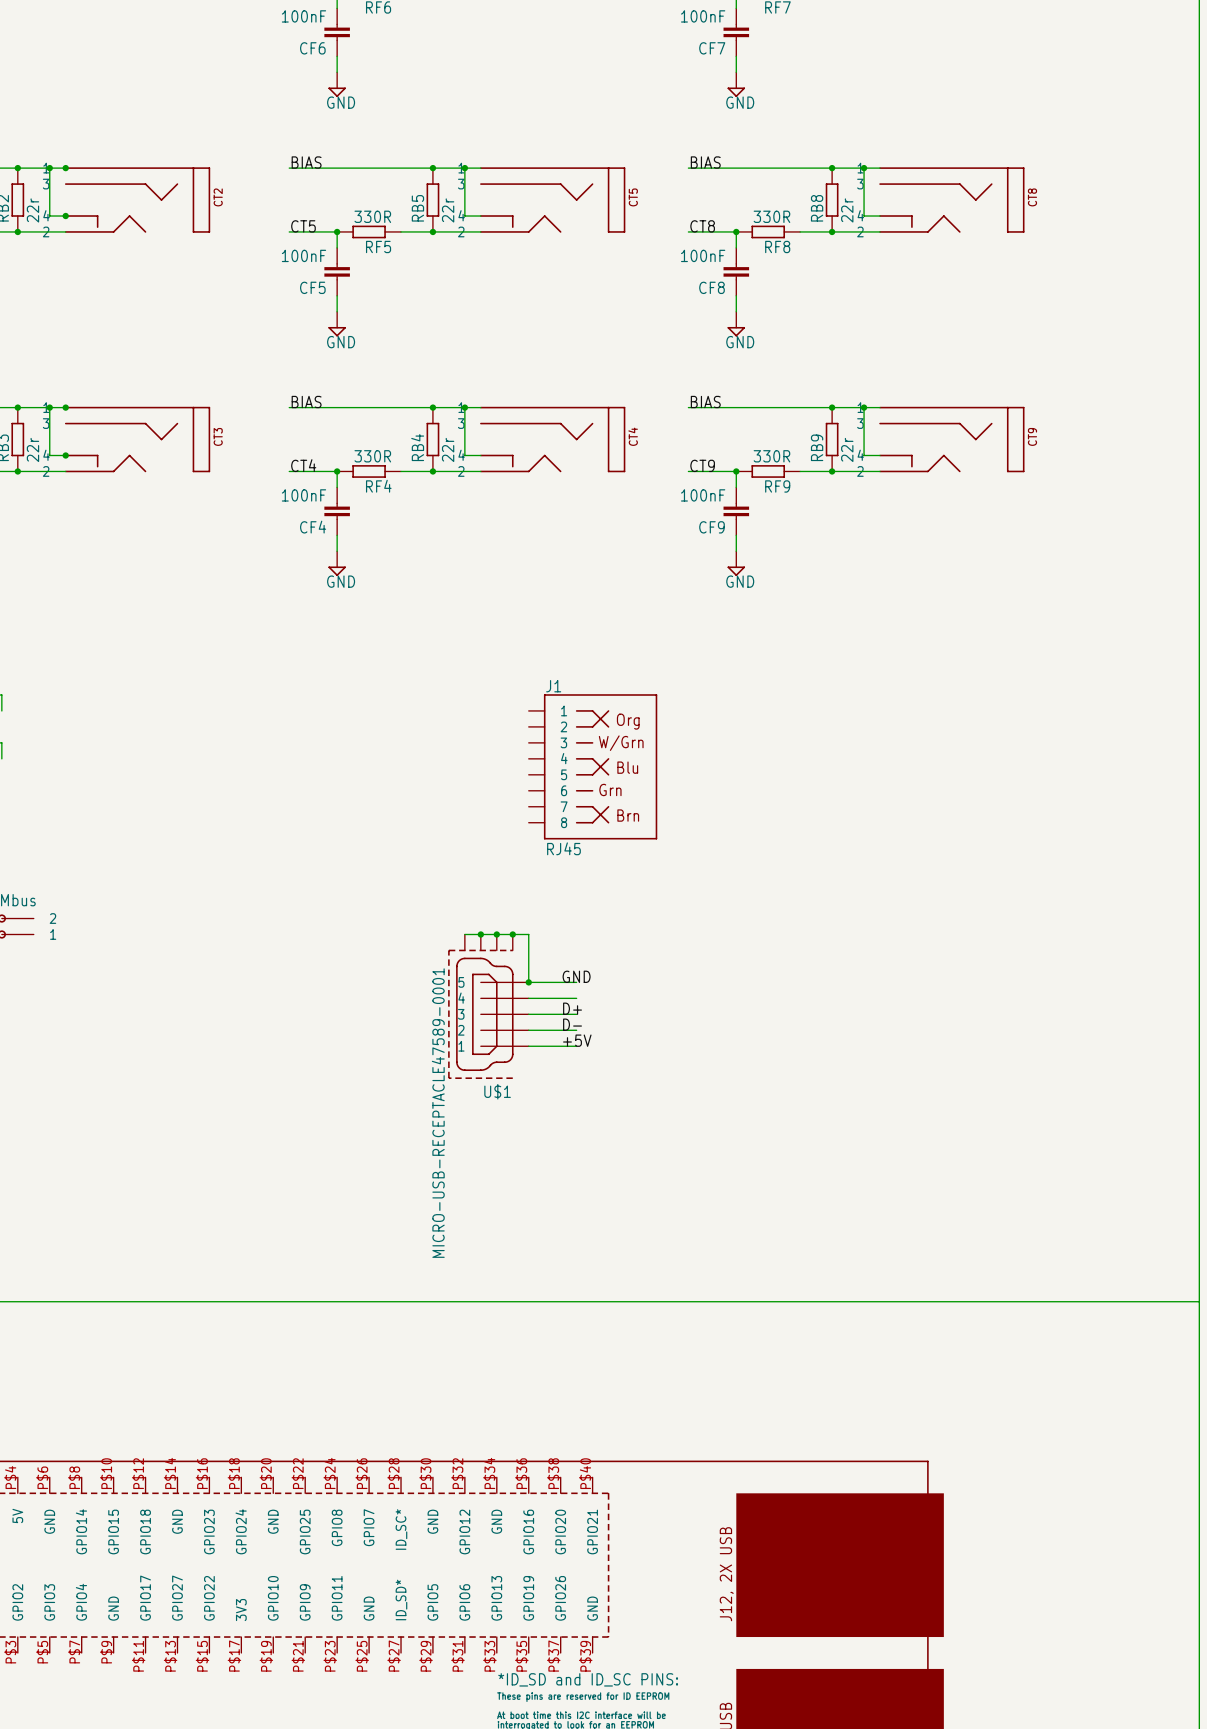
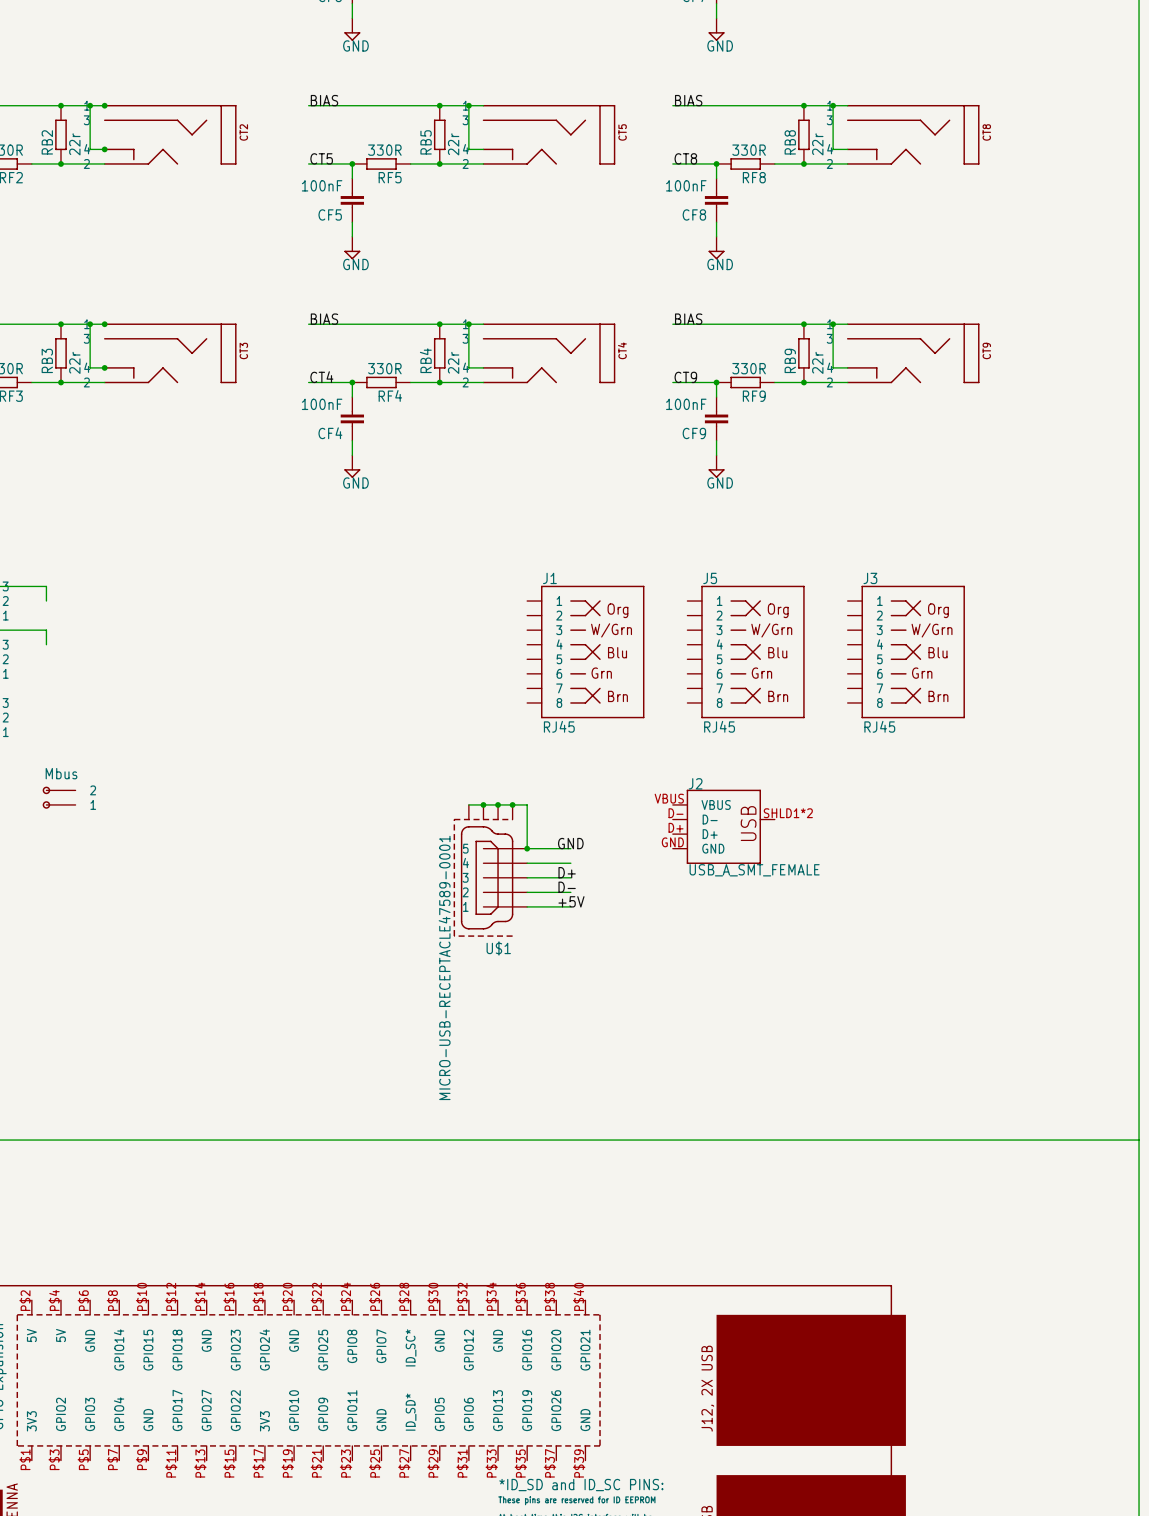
J5: none -> RJ45 (746, 652)
J3: none -> RJ45 (906, 652)
J2: none -> USB_A_SMT_FEMALE (723, 826)

